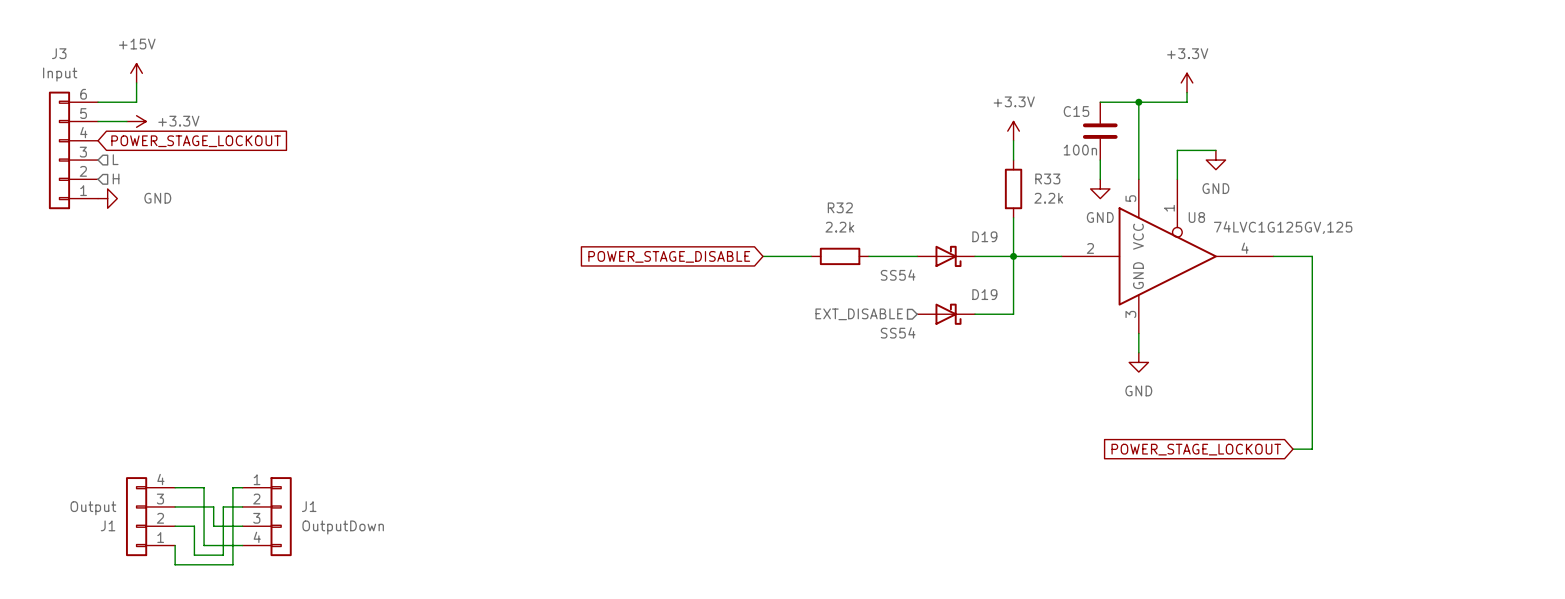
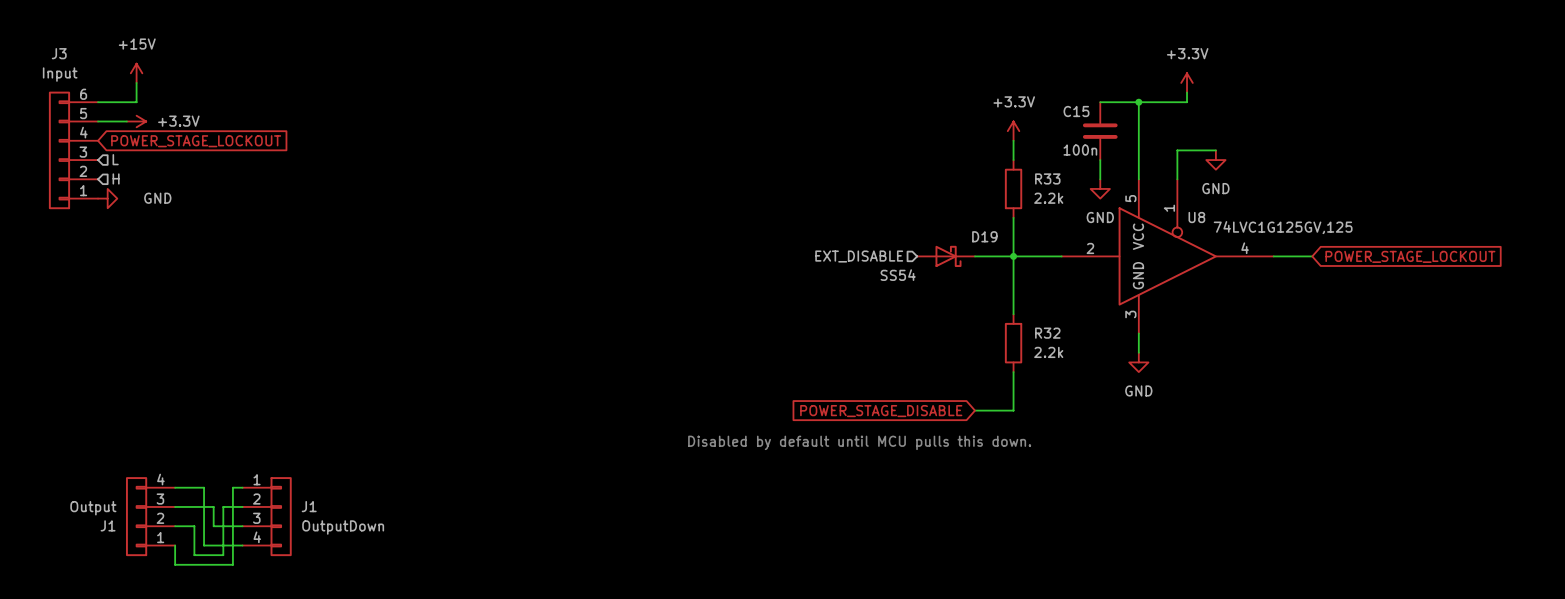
R32 name position: R32 (840, 207) -> R32 (1047, 333)
global label: POWER_STAGE_DISABLE (669, 256) -> none
wire: (762, 256) (811, 256) -> none
R32 rotation: 0° (840, 256) -> 90° clockwise (1013, 343)
R32 position: (840, 256) -> (1013, 343)
wire: (868, 256) (917, 256) -> none
wire: (1312, 256) (1312, 449) (1293, 449) -> none
global label: none -> POWER_STAGE_LOCKOUT (1410, 256)
hierarchical label position: EXT_DISABLE (859, 314) -> EXT_DISABLE (859, 256)
D19: SS54 (946, 314) -> none
wire: (975, 314) (1013, 314) -> none
wire: none -> (1013, 372) (1013, 410) (975, 410)
global label: none -> POWER_STAGE_DISABLE (881, 411)
text: none -> Disabled by default until MCU pulls this down. (859, 442)
global label: POWER_STAGE_LOCKOUT (1196, 449) -> none

